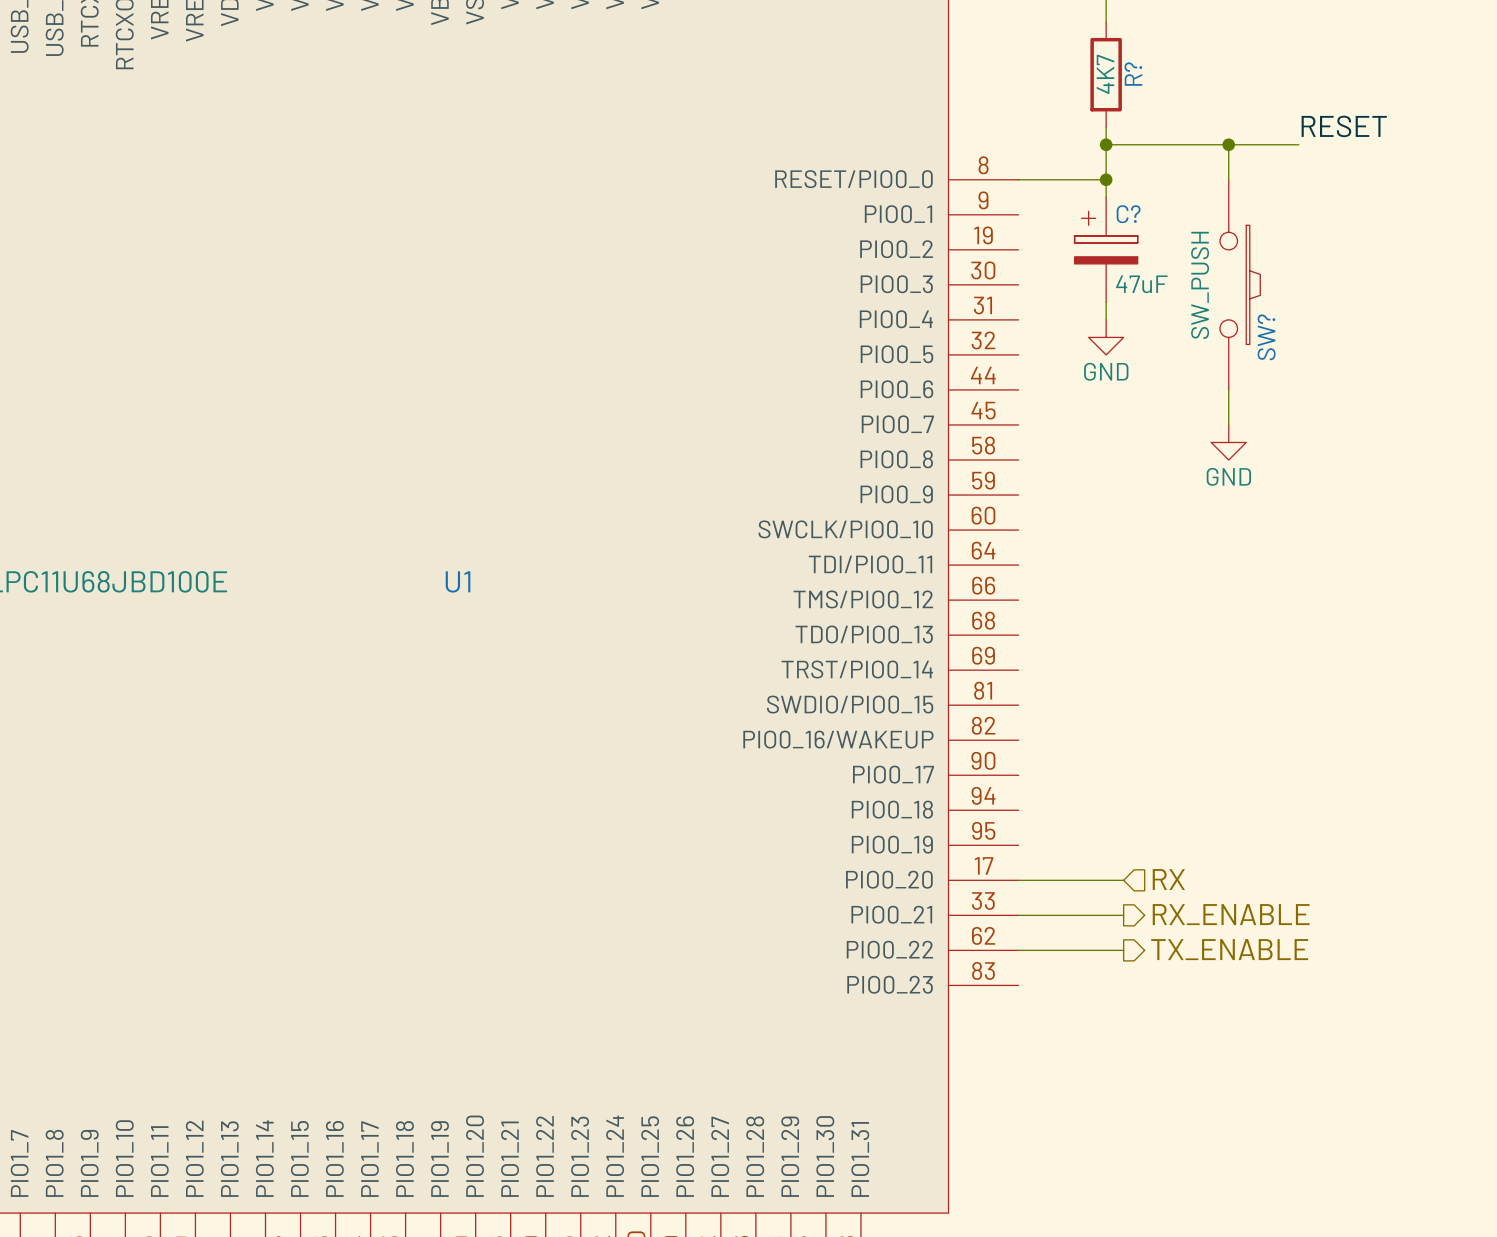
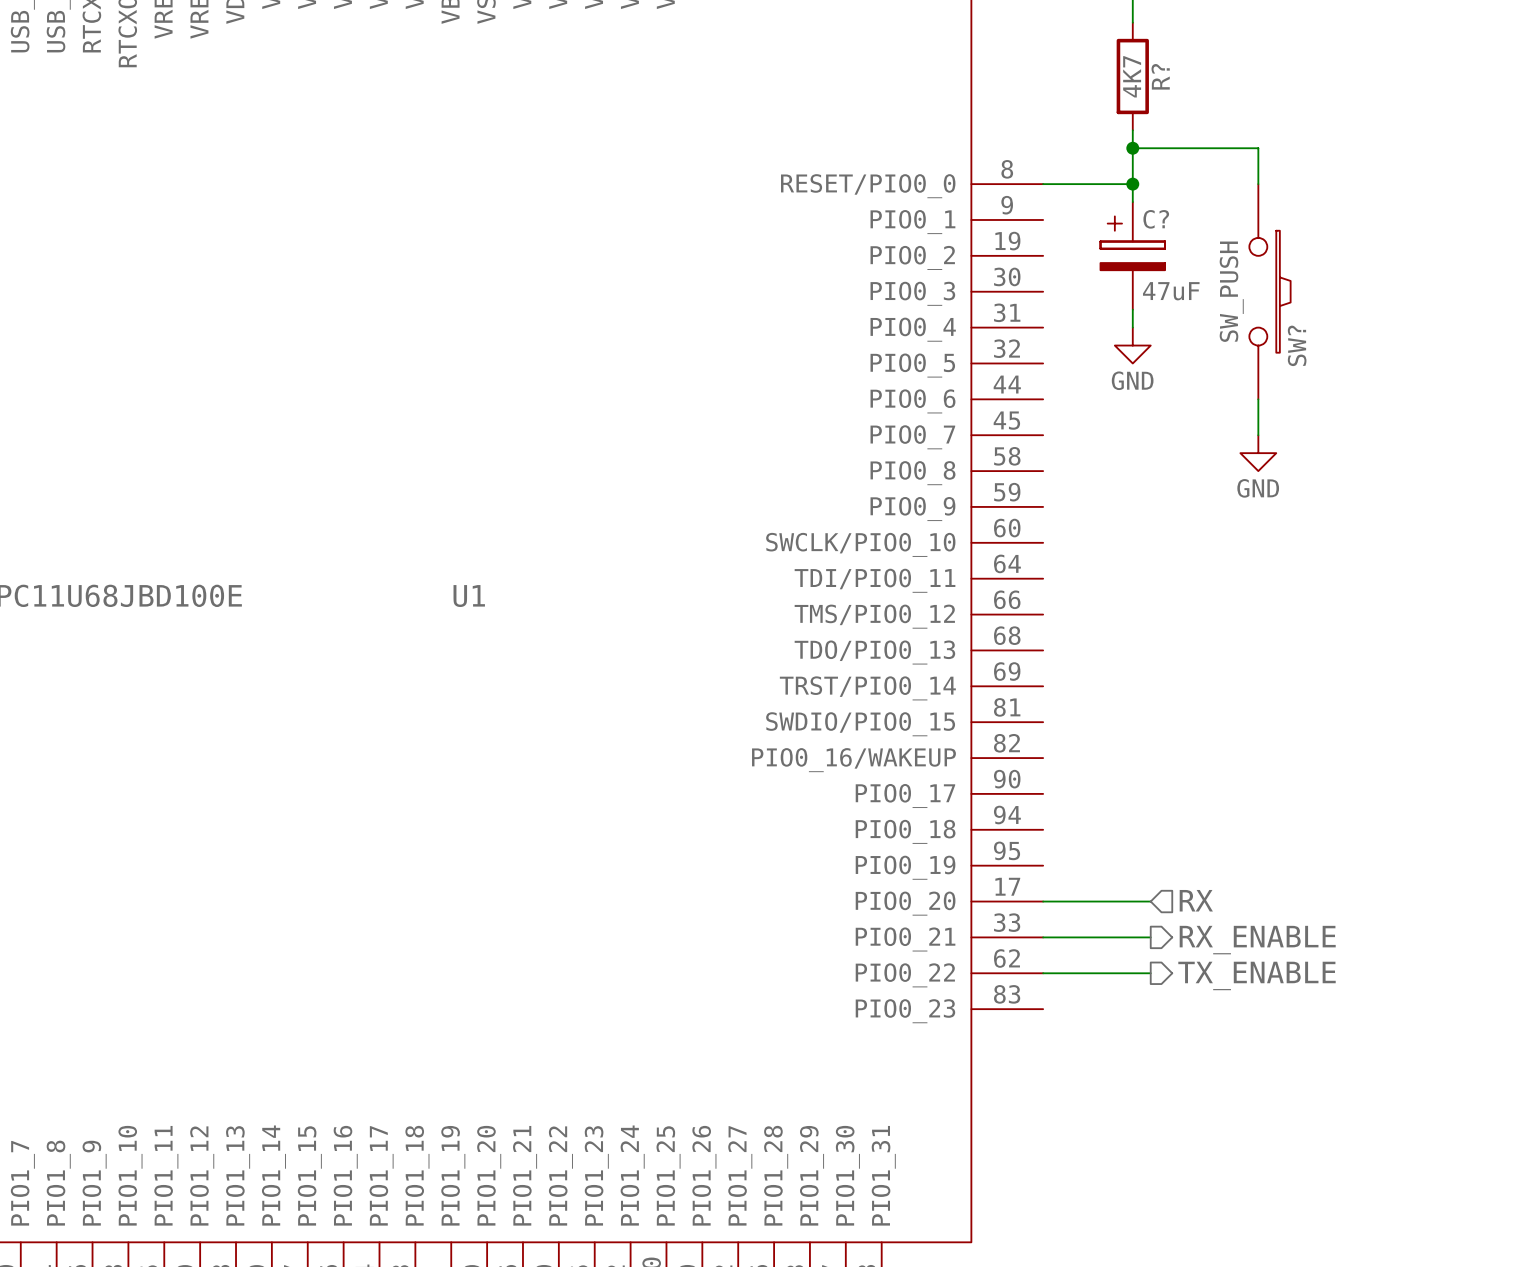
label: RESET (1344, 126) -> none
wire: (1228, 144) (1298, 144) -> none
junction: (1228, 144) -> none

